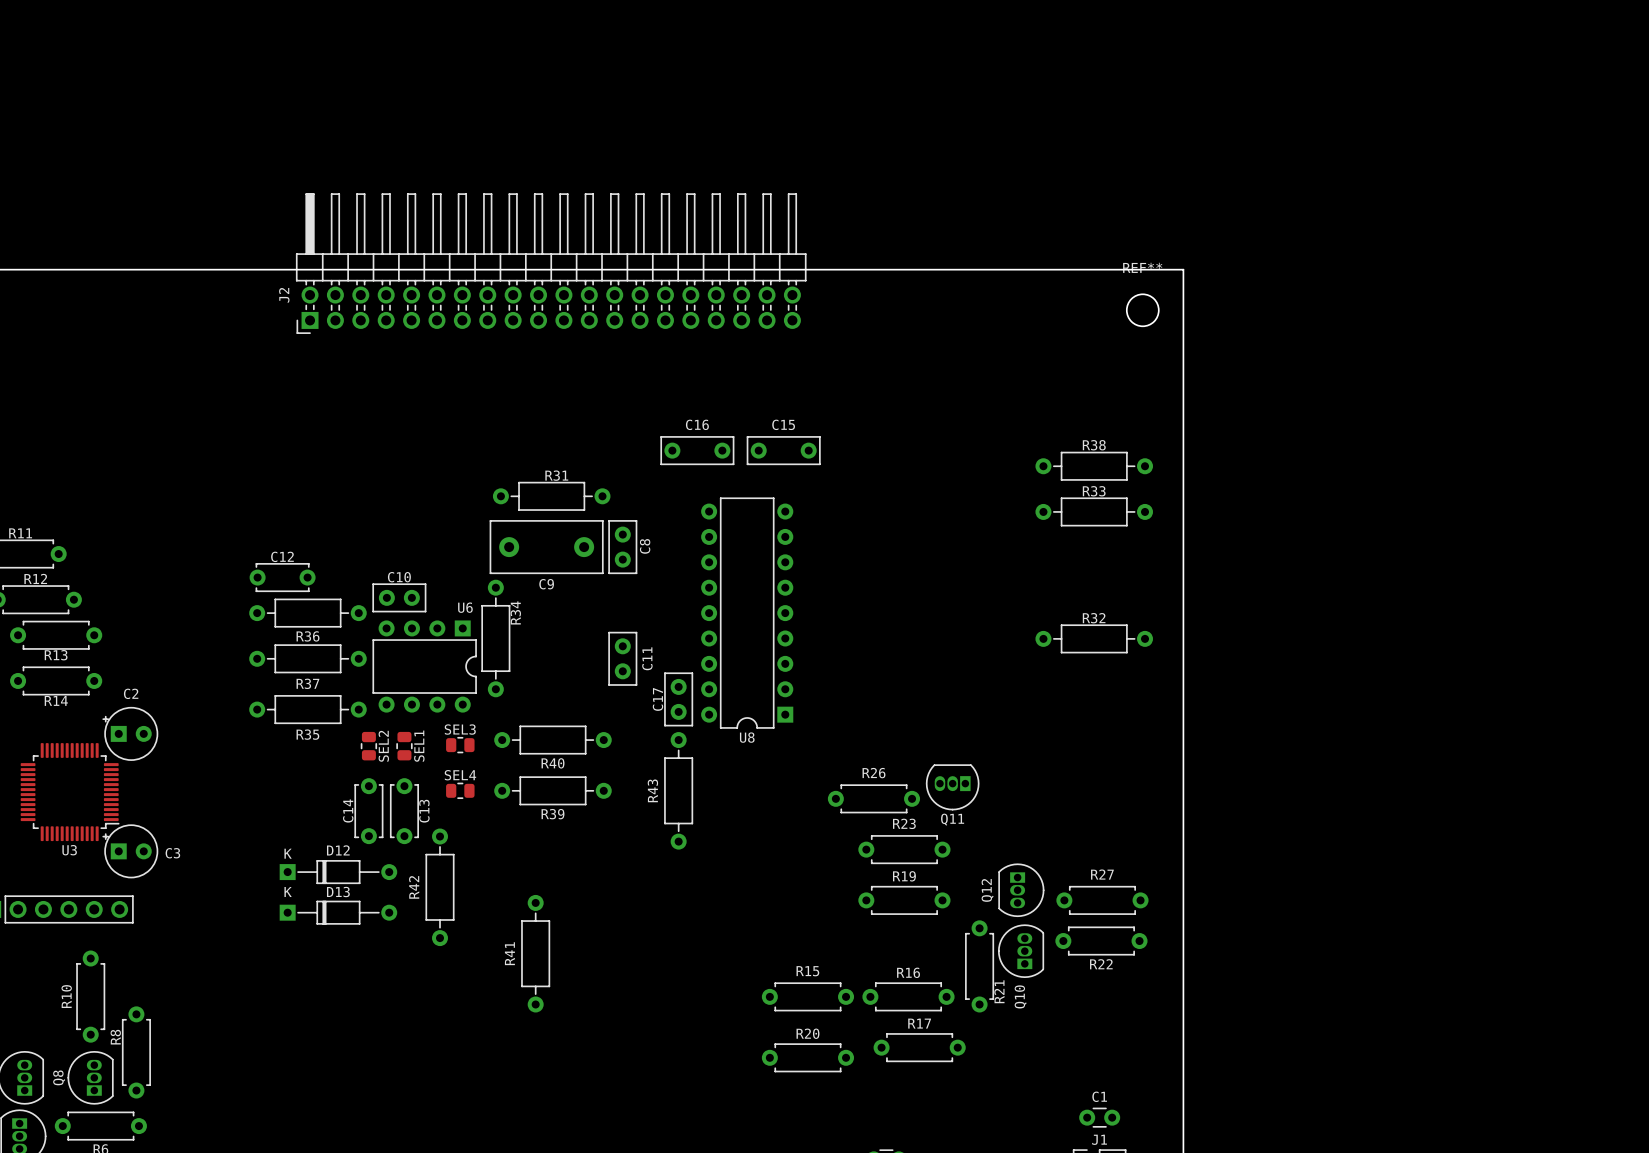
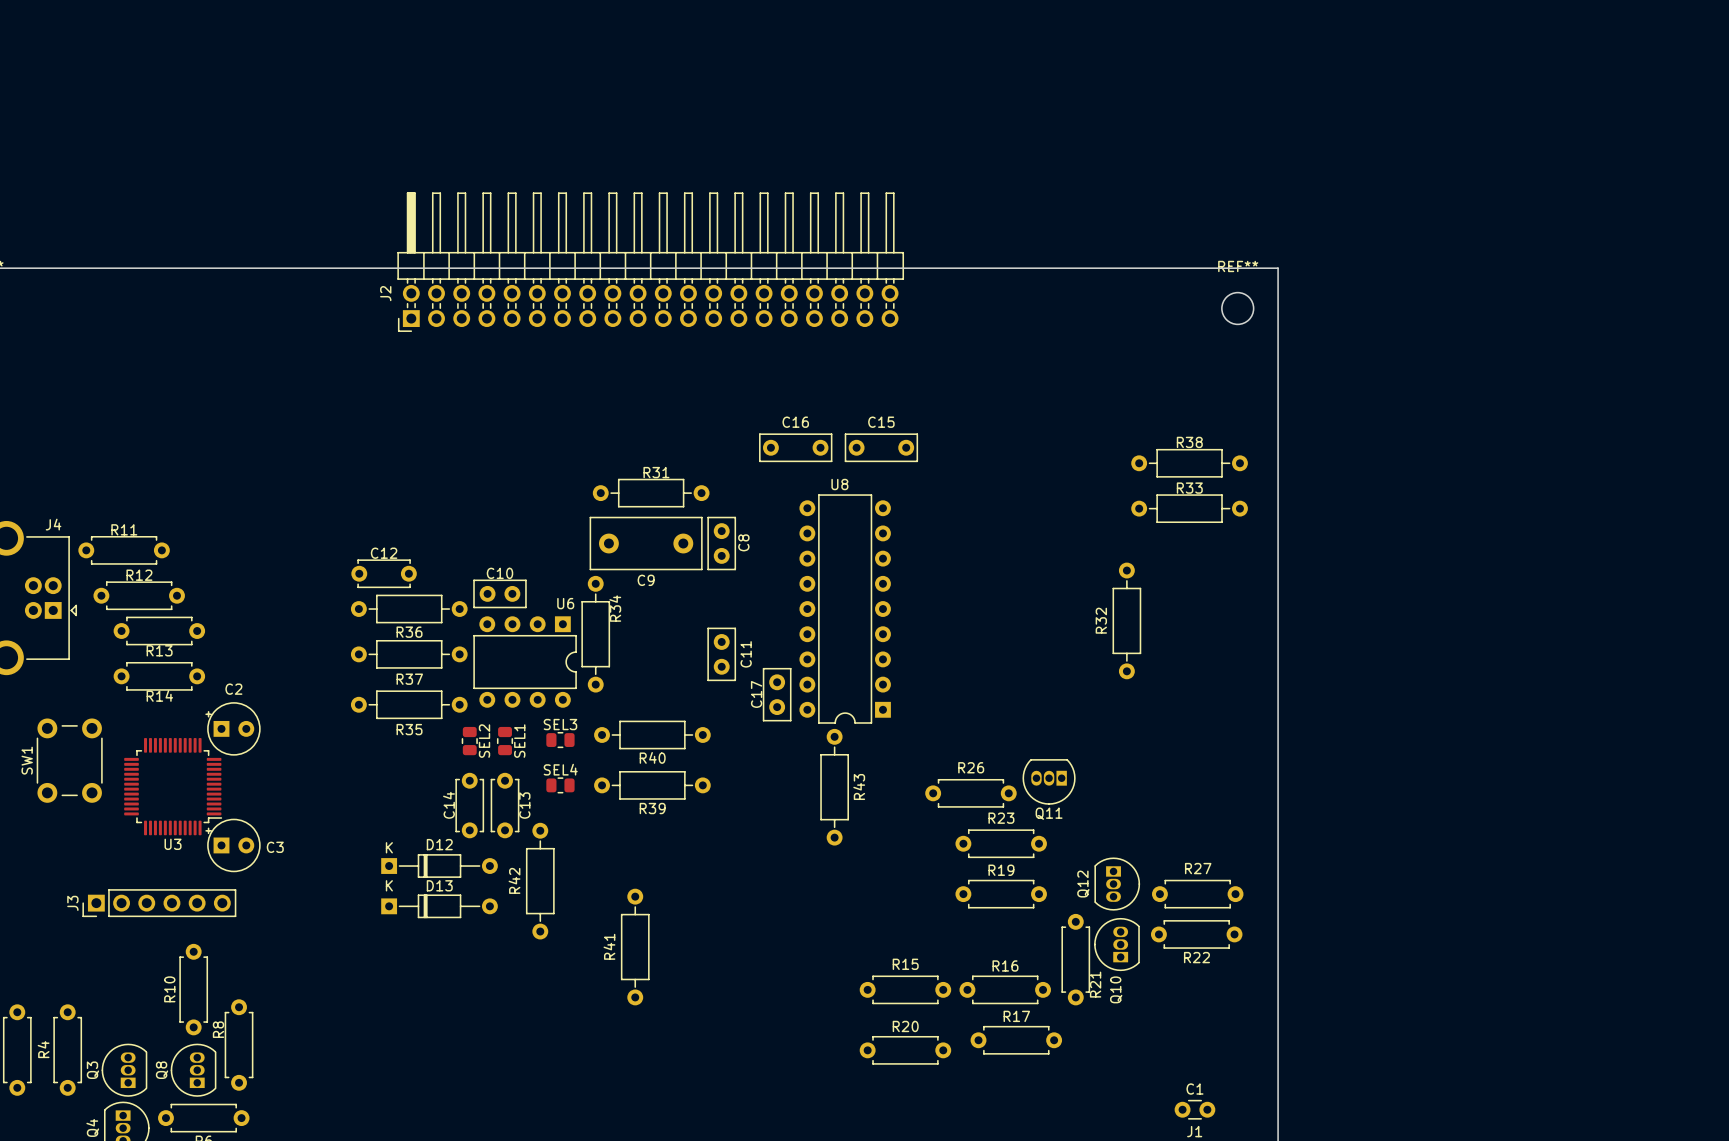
R32 name position: R32 (1094, 618) -> R32 (1101, 620)
R32 rotation: 0° (1094, 638) -> 90° clockwise (1126, 620)
U8 name position: U8 (747, 737) -> U8 (839, 484)
R43 name position: R43 (652, 790) -> R43 (859, 786)
R43 position: (678, 790) -> (834, 787)

